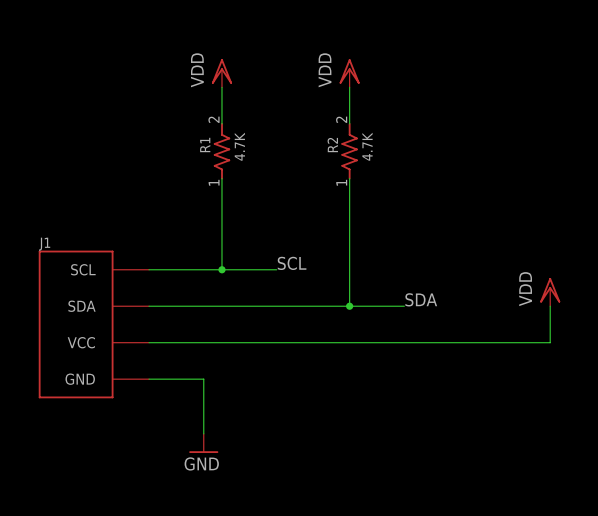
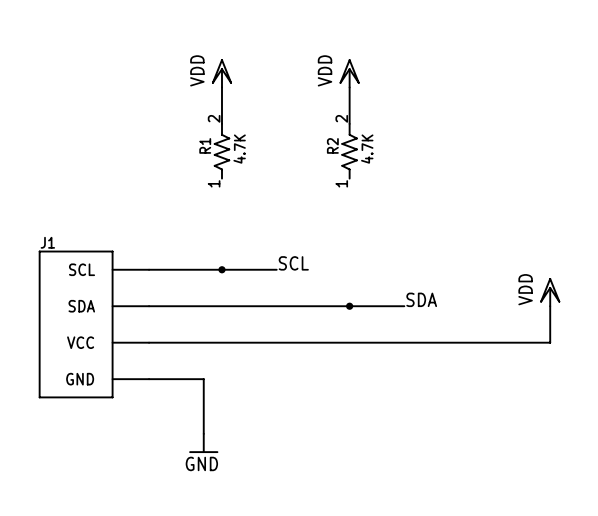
wire: (221, 178) (221, 269) -> none
wire: (349, 178) (349, 306) -> none

